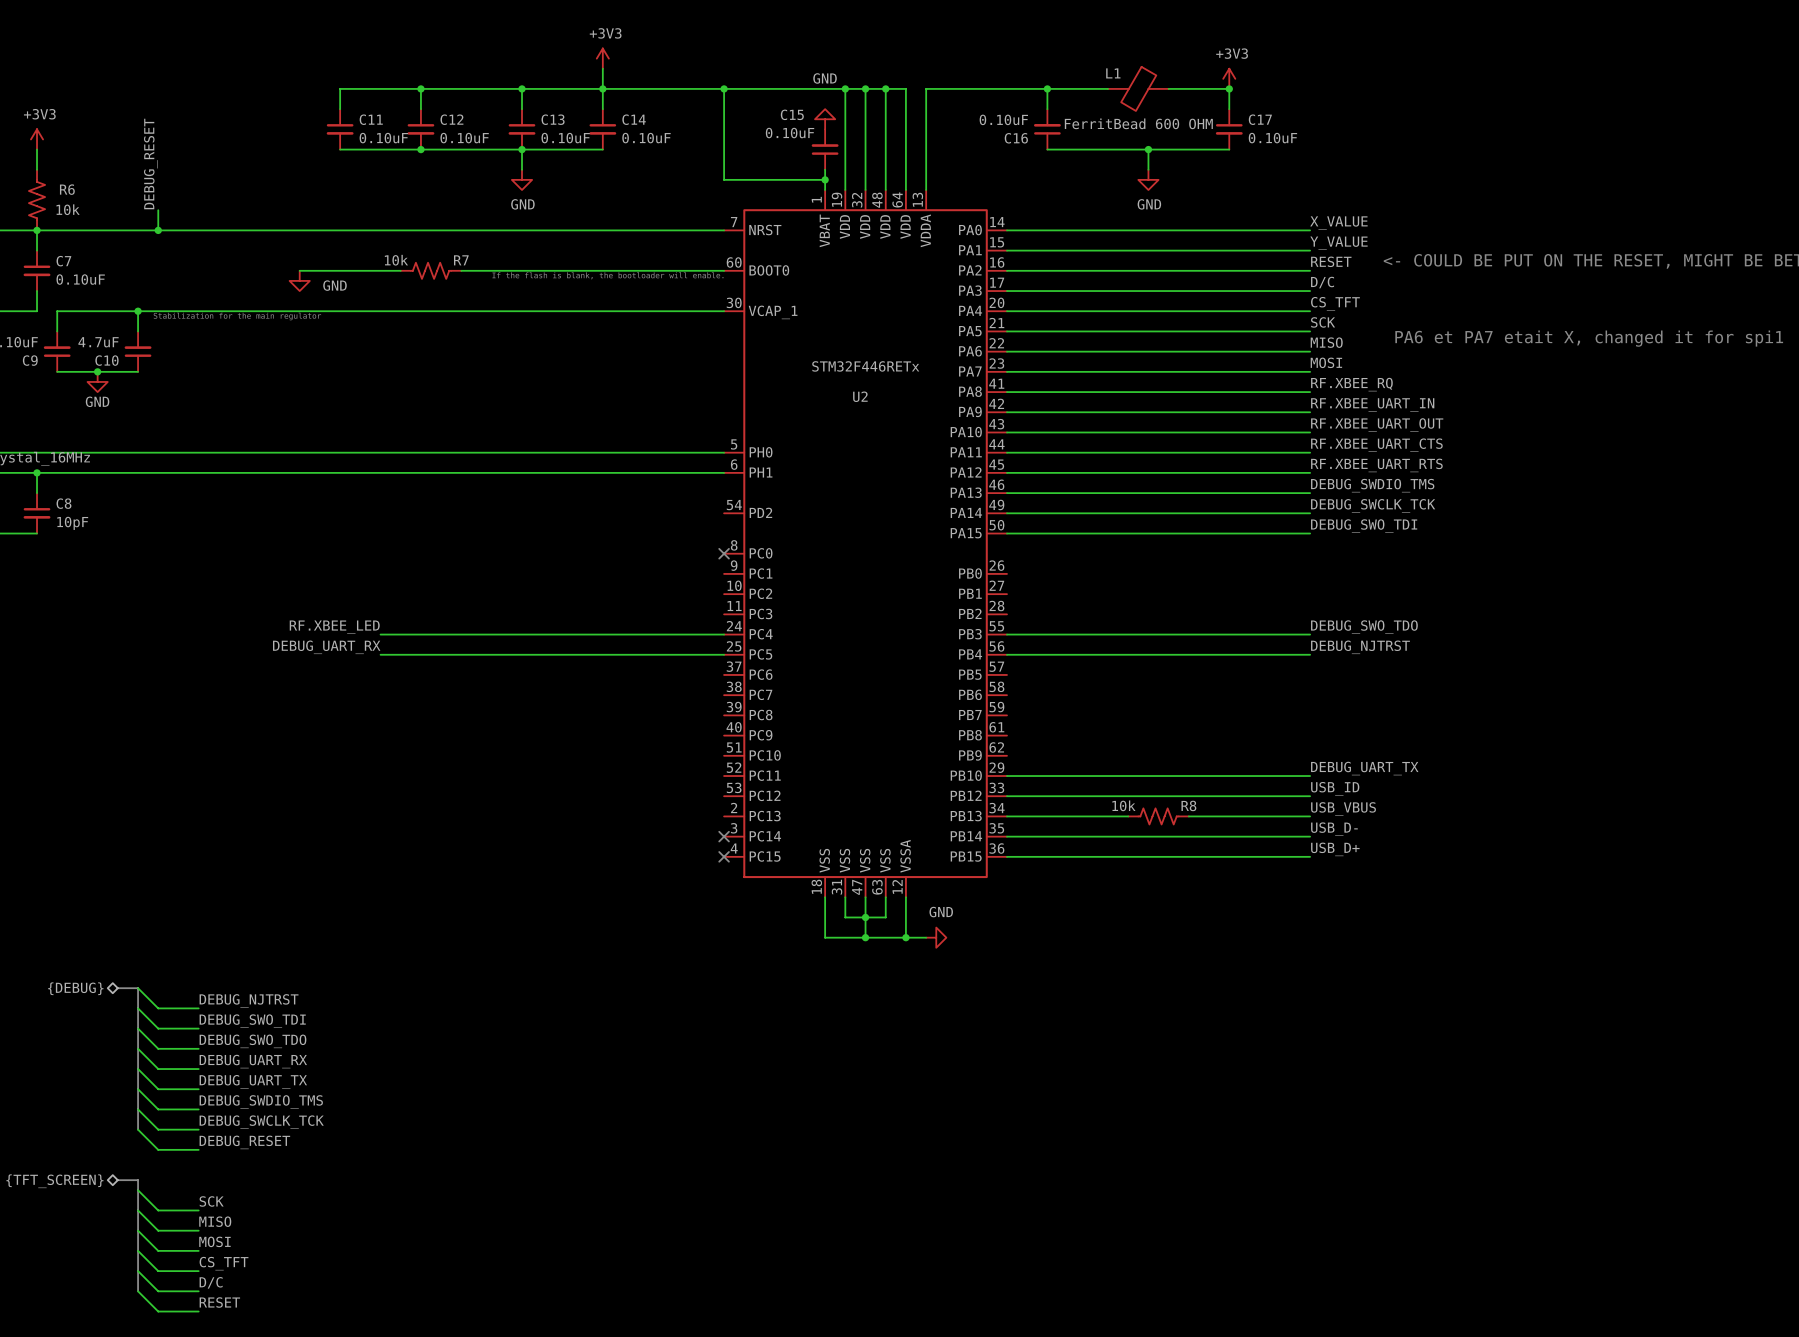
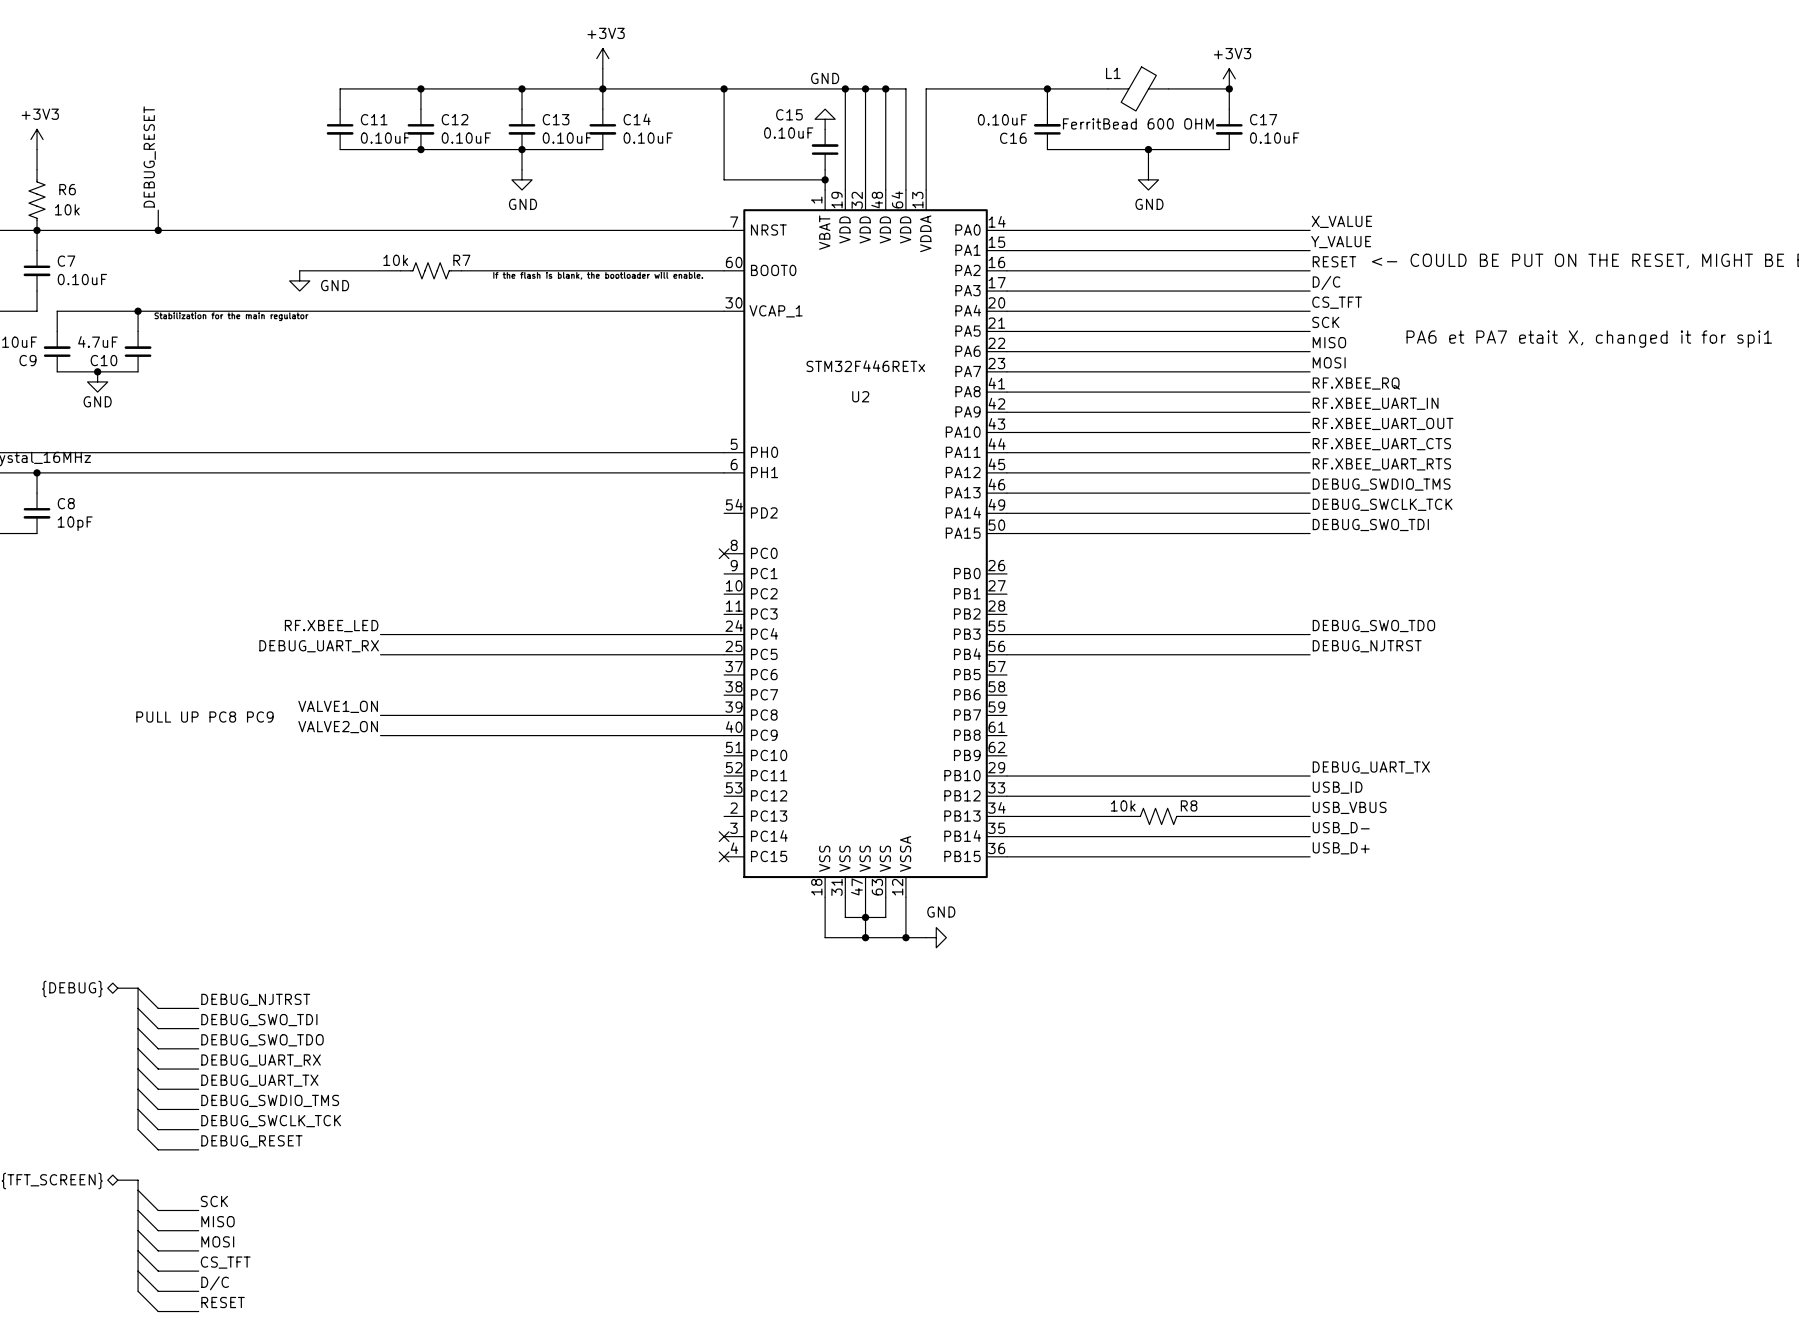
label: none -> VALVE1_ON (338, 706)
wire: none -> (380, 715) (724, 715)
text: none -> PULL UP PC8 PC9 (204, 717)
label: none -> VALVE2_ON (338, 727)
wire: none -> (380, 735) (724, 735)

